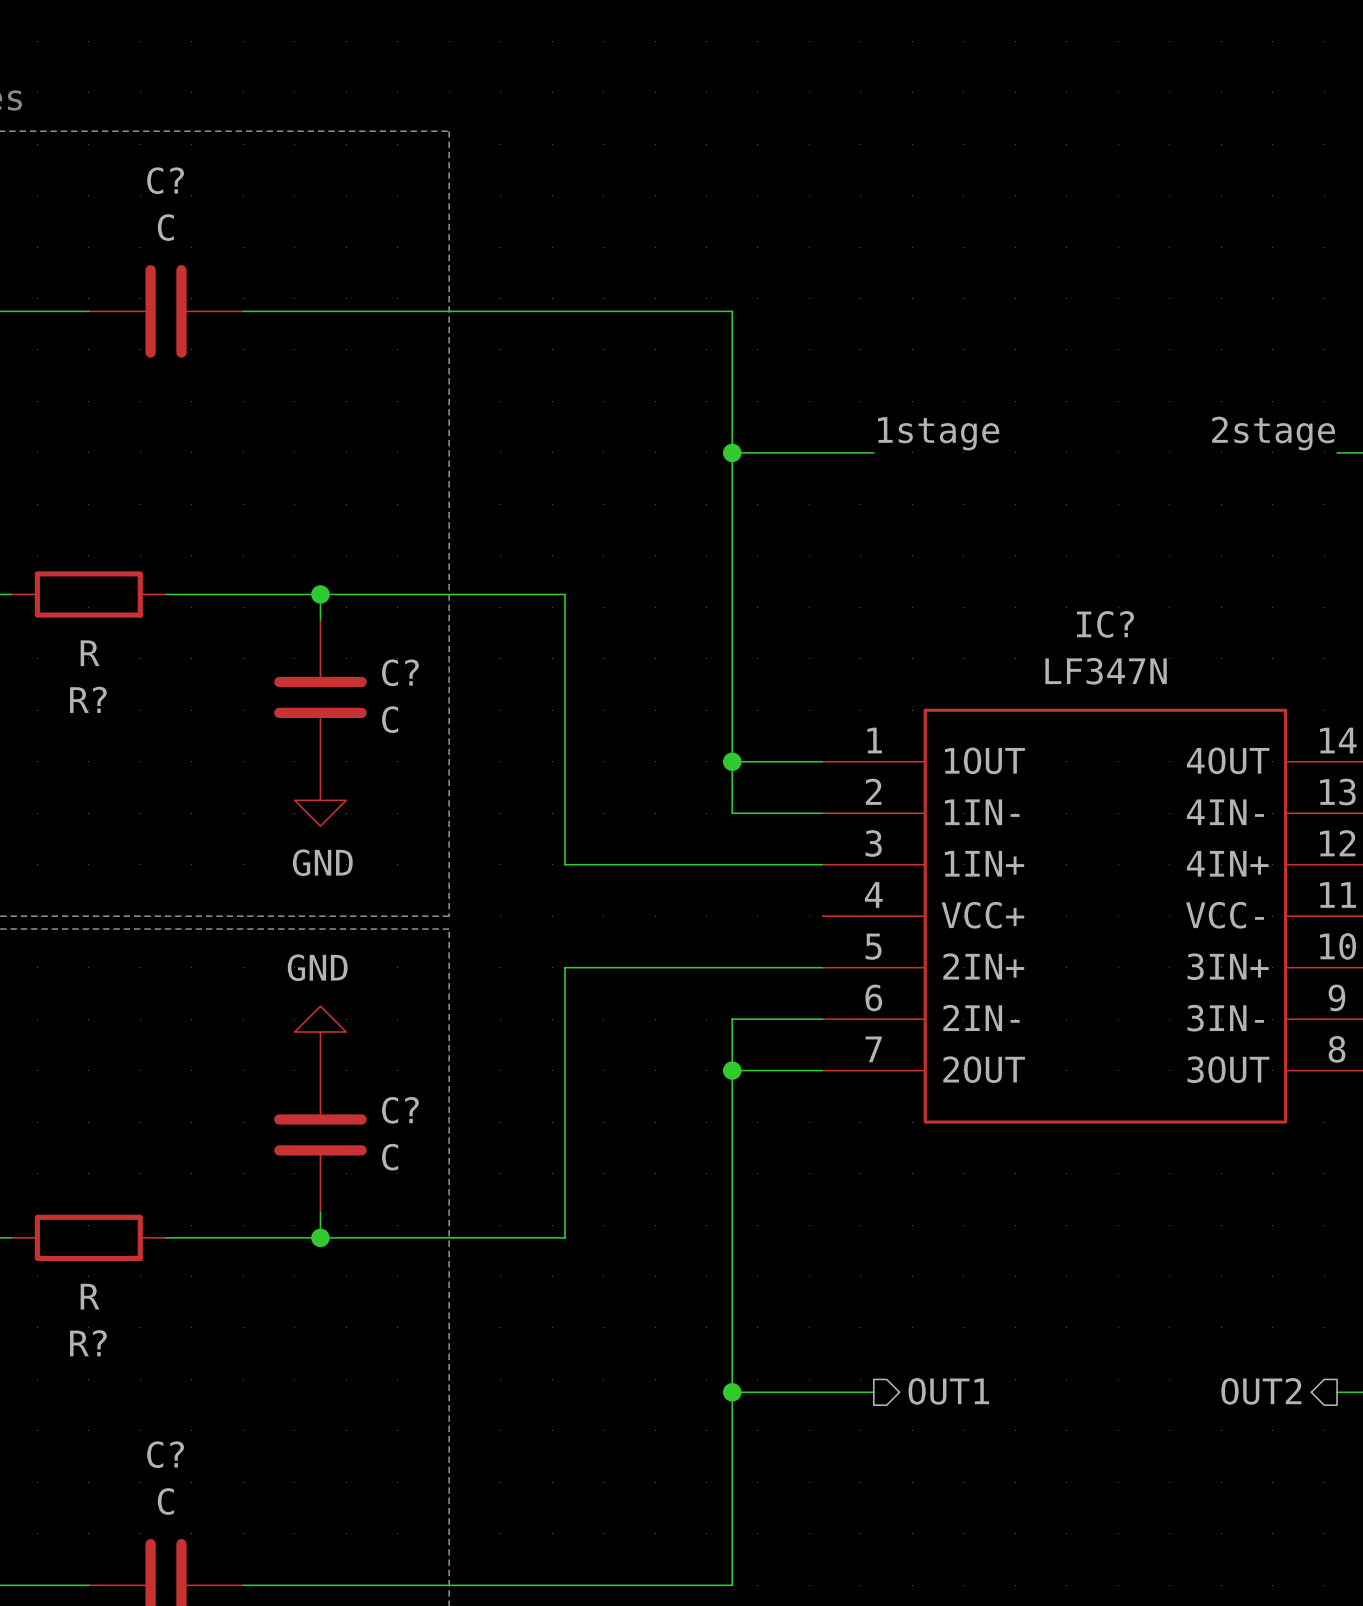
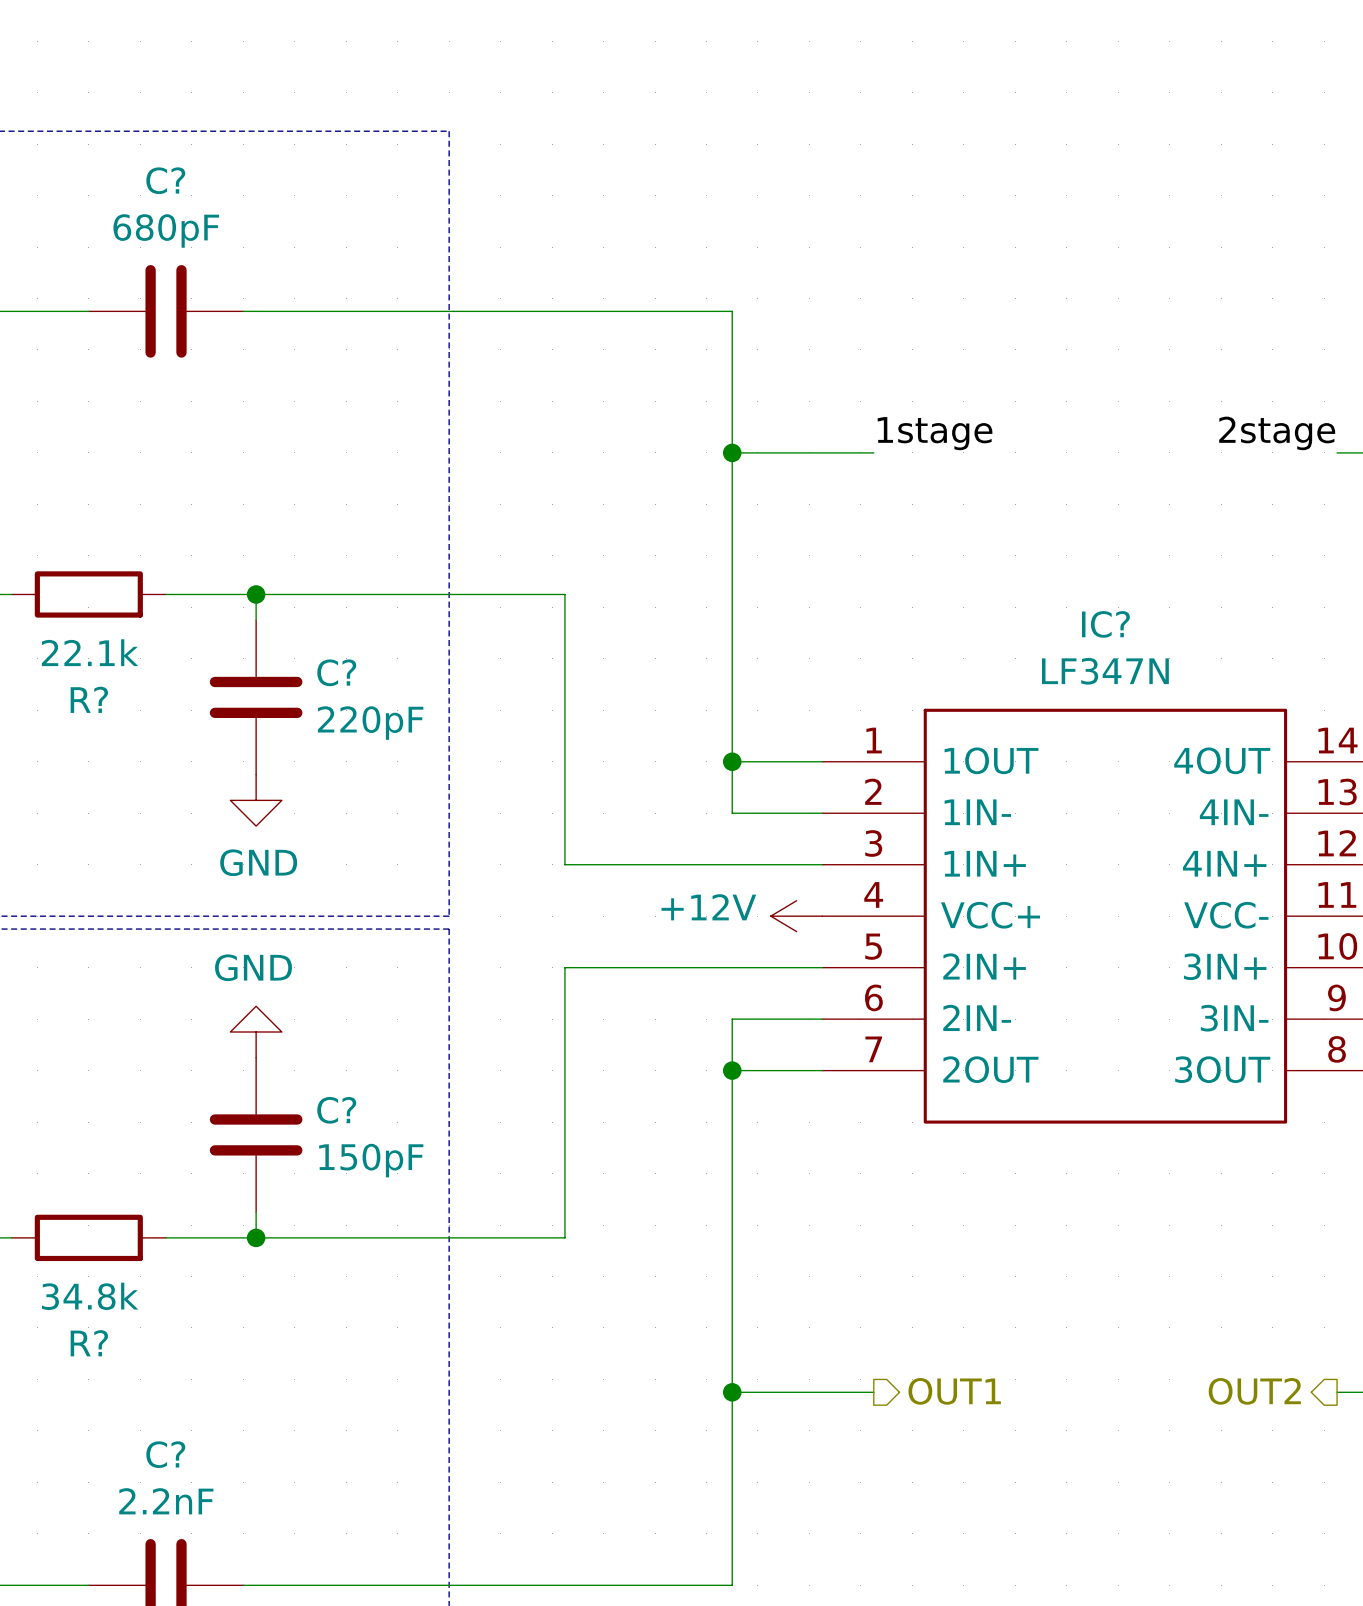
C? value: C (165, 227) -> 680pF (166, 230)
wire: (320, 594) (320, 620) -> (256, 594) (256, 620)
junction position: (320, 594) -> (256, 594)
R? value: R (90, 653) -> 22.1k (90, 652)
C?: none -> 220pF (256, 697)
C?: C (320, 697) -> none
power symbol position: GND (320, 800) -> GND (256, 800)
power symbol: none -> +12V (796, 916)
power symbol position: GND (320, 1032) -> GND (256, 1032)
C?: none -> 150pF (256, 1134)
C?: C (320, 1134) -> none
wire: (320, 1212) (320, 1237) -> (256, 1212) (256, 1237)
junction position: (320, 1237) -> (256, 1237)
R? value: R (90, 1296) -> 34.8k (90, 1296)
C? value: C (165, 1501) -> 2.2nF (166, 1501)

